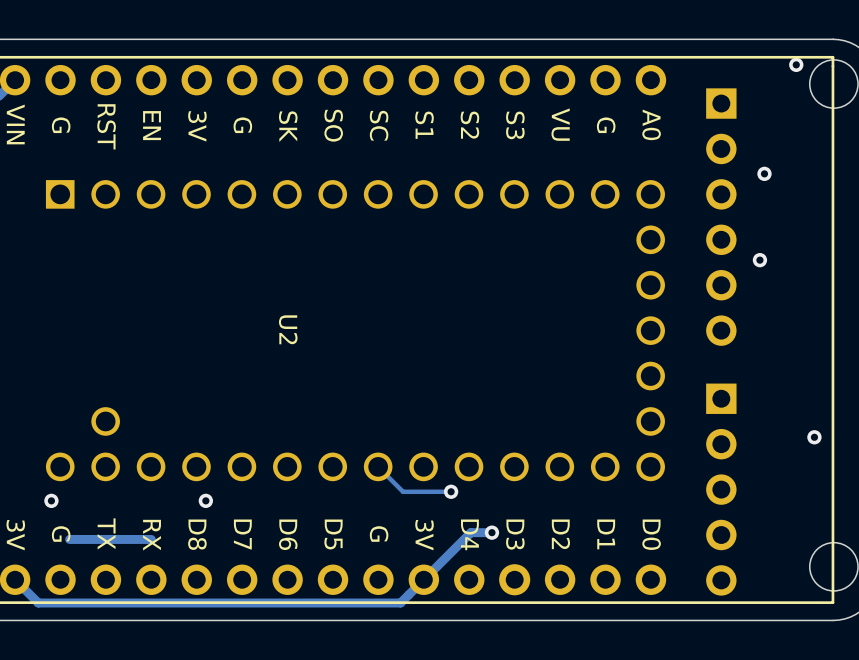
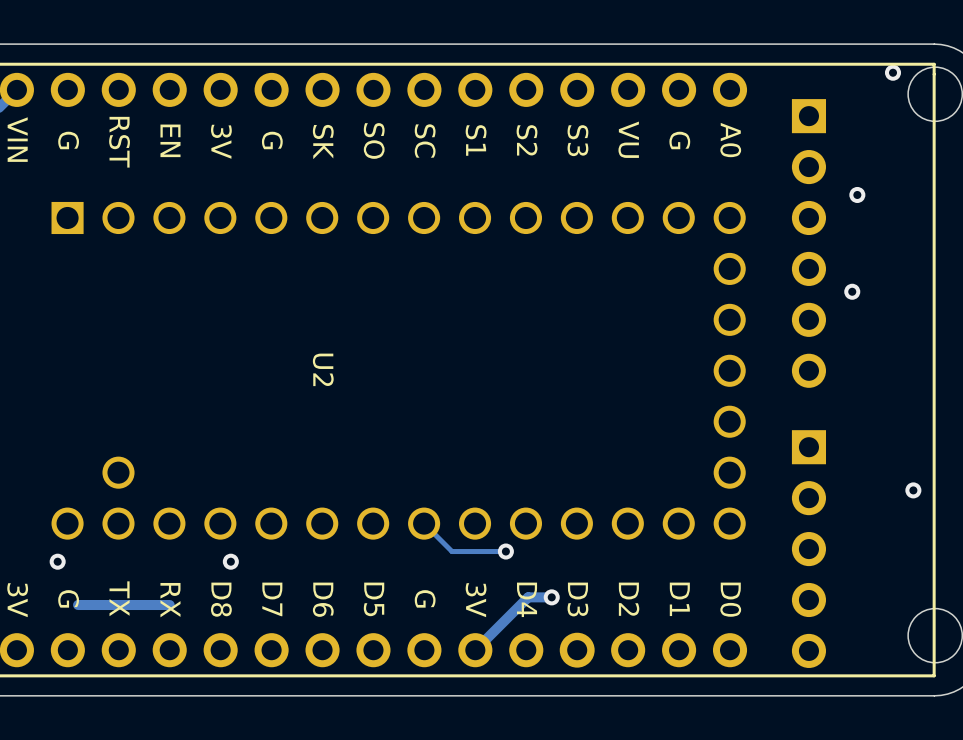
track: (423, 579) (400, 603) (38, 603) (15, 579) -> none

